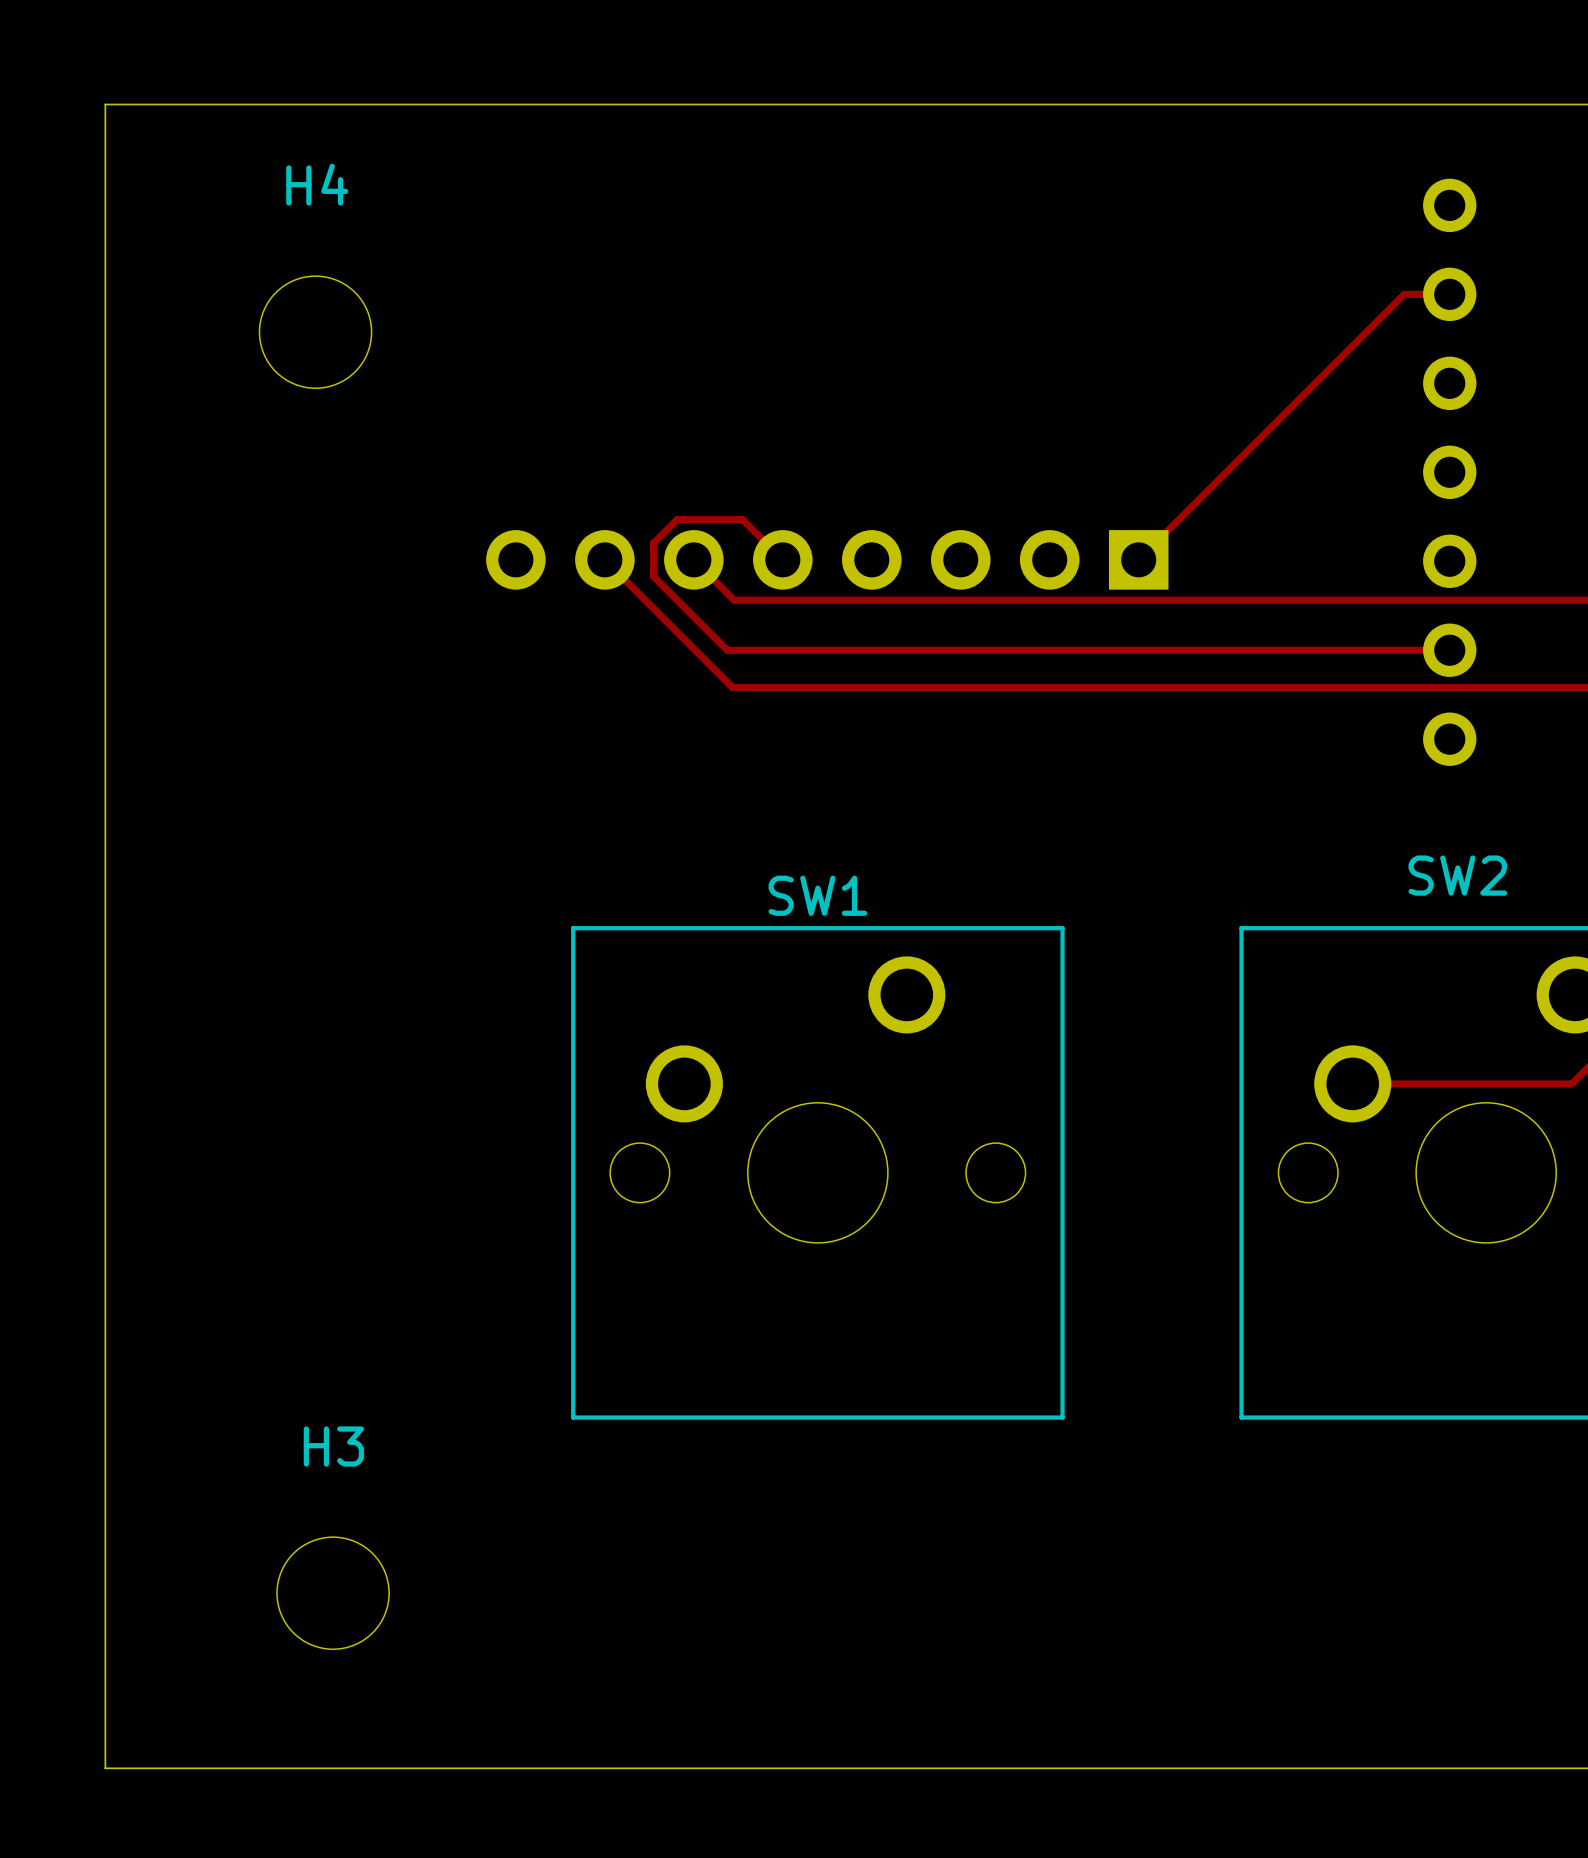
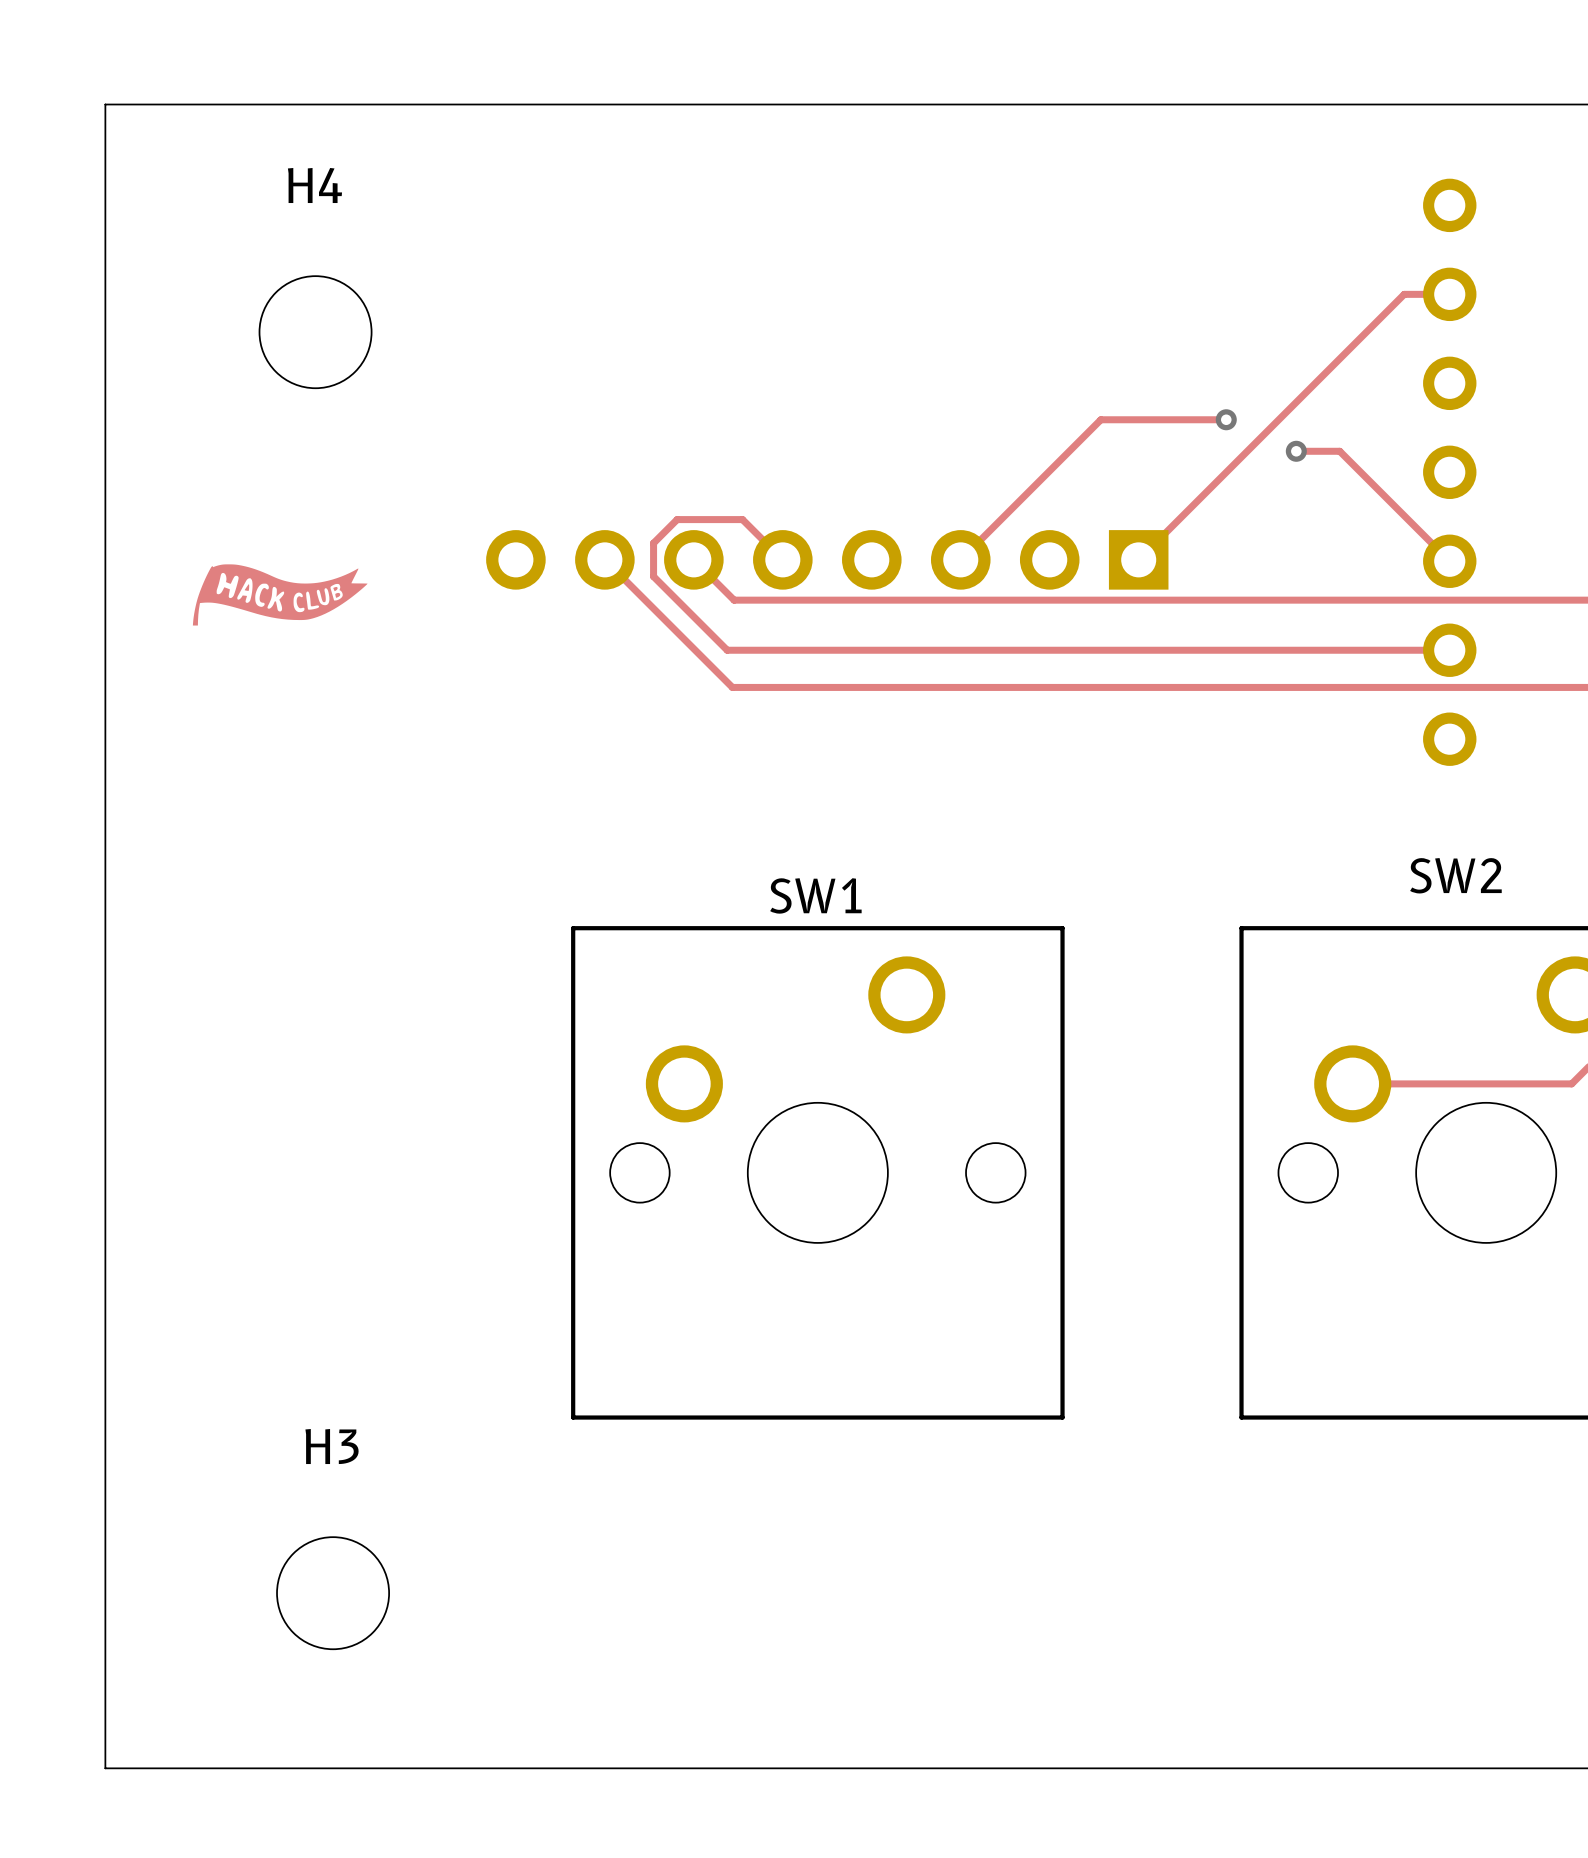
track: none -> (1226, 419) (1100, 419) (960, 559)
via: none -> (1226, 419)
track: none -> (1296, 451) (1339, 451) (1449, 561)
via: none -> (1296, 451)
drawing: none -> [192, 564, 368, 626]

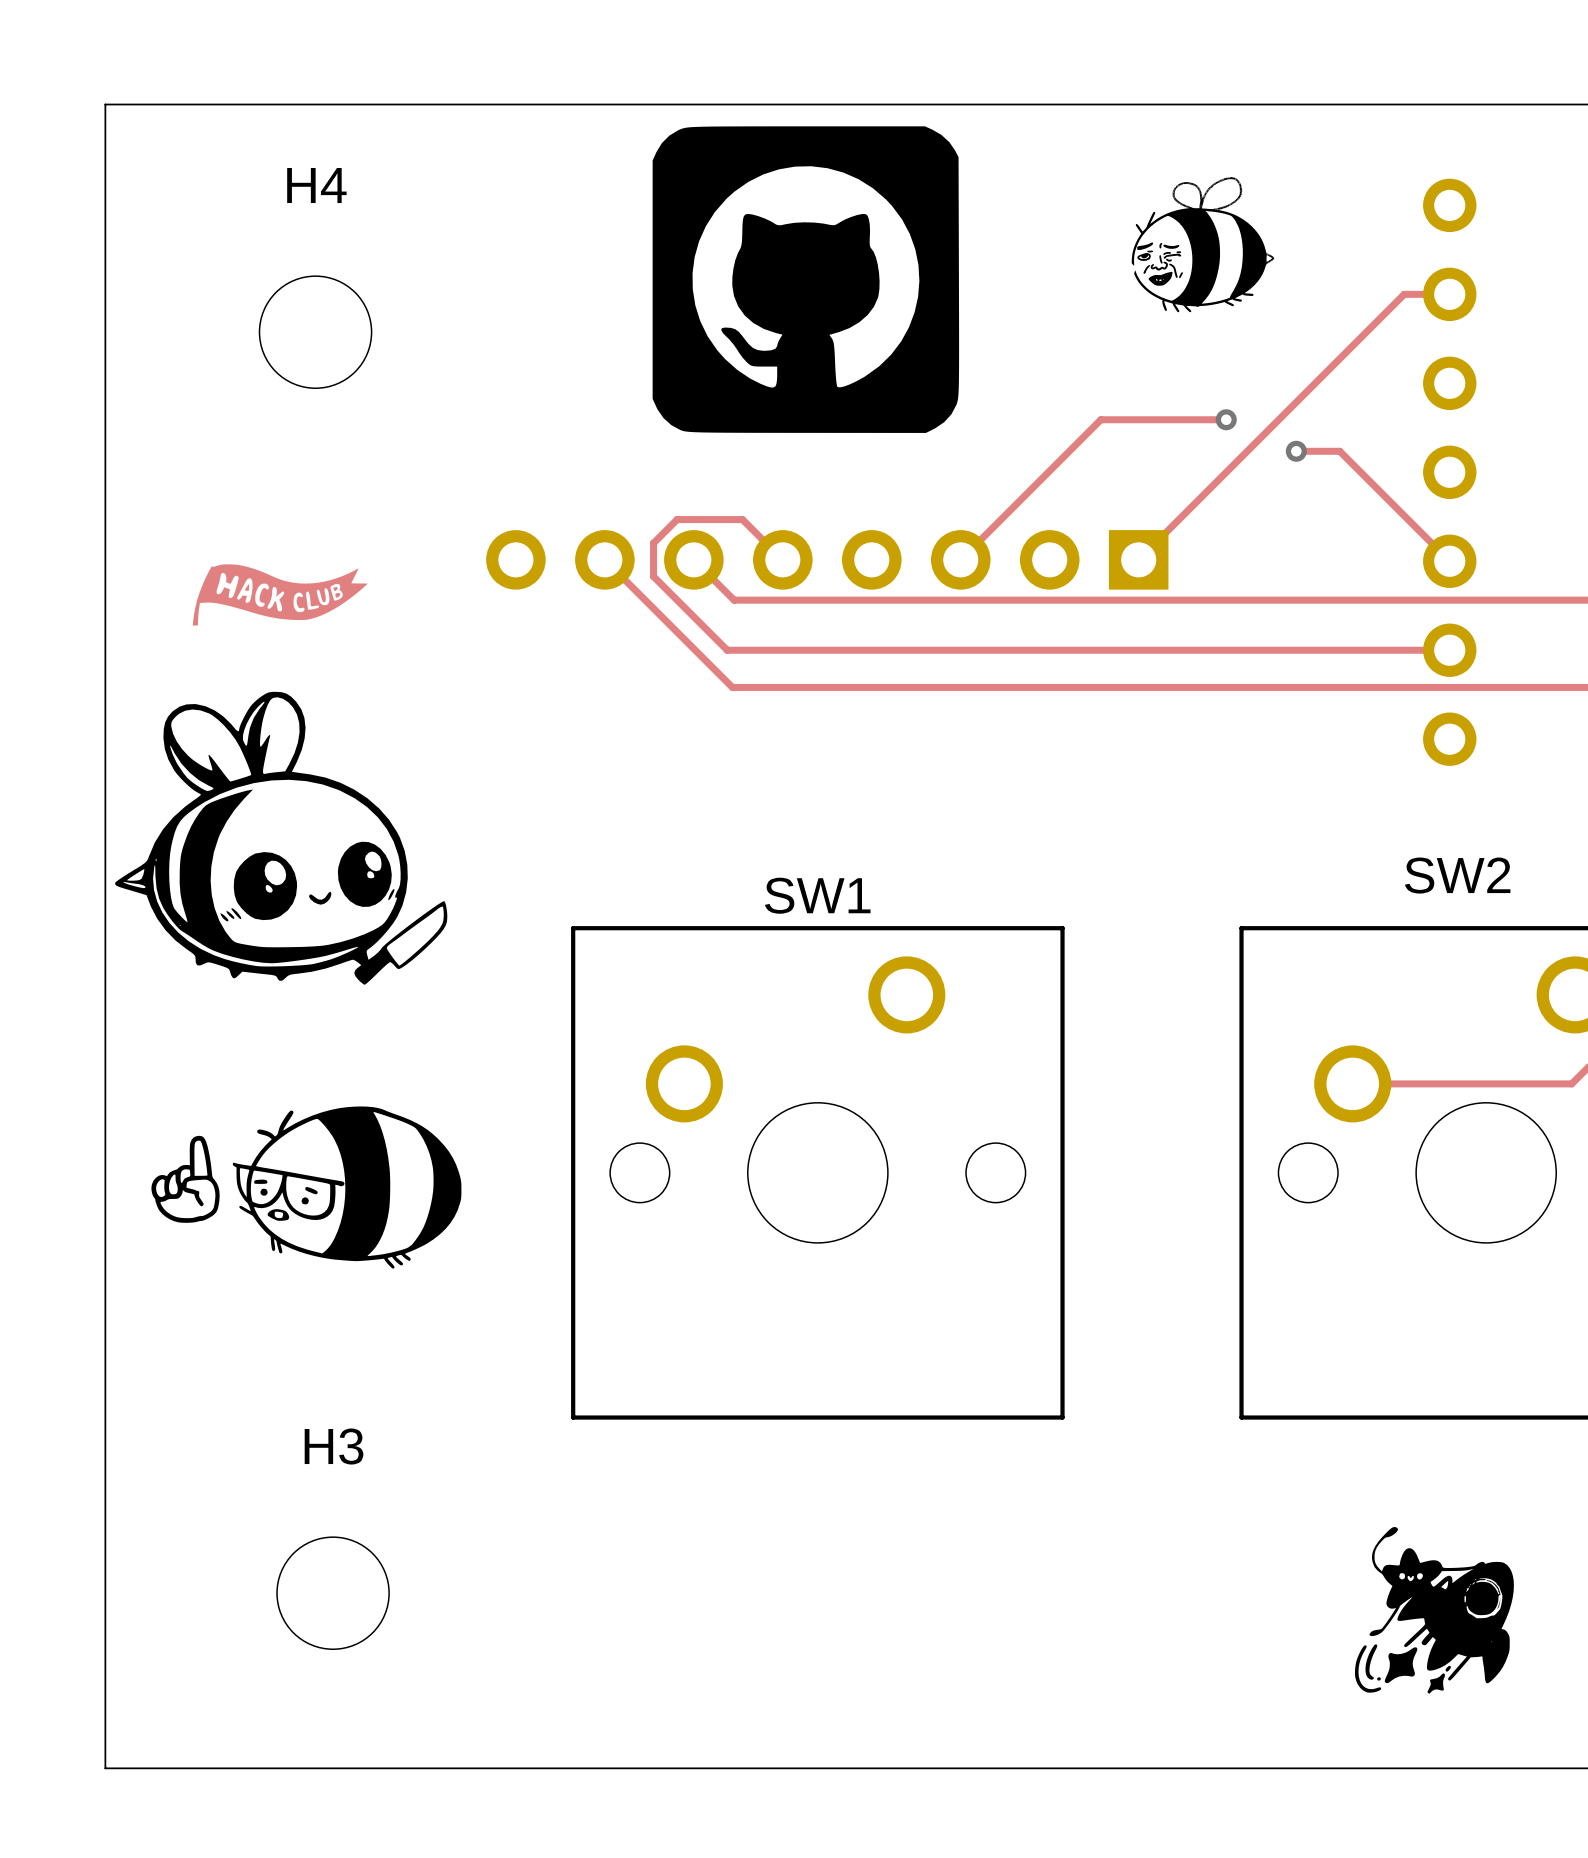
drawing: none -> [652, 126, 960, 433]
drawing: none -> [1131, 177, 1275, 313]
drawing: none -> [115, 691, 448, 985]
drawing: none -> [151, 1106, 462, 1269]
drawing: none -> [1355, 1527, 1514, 1694]

